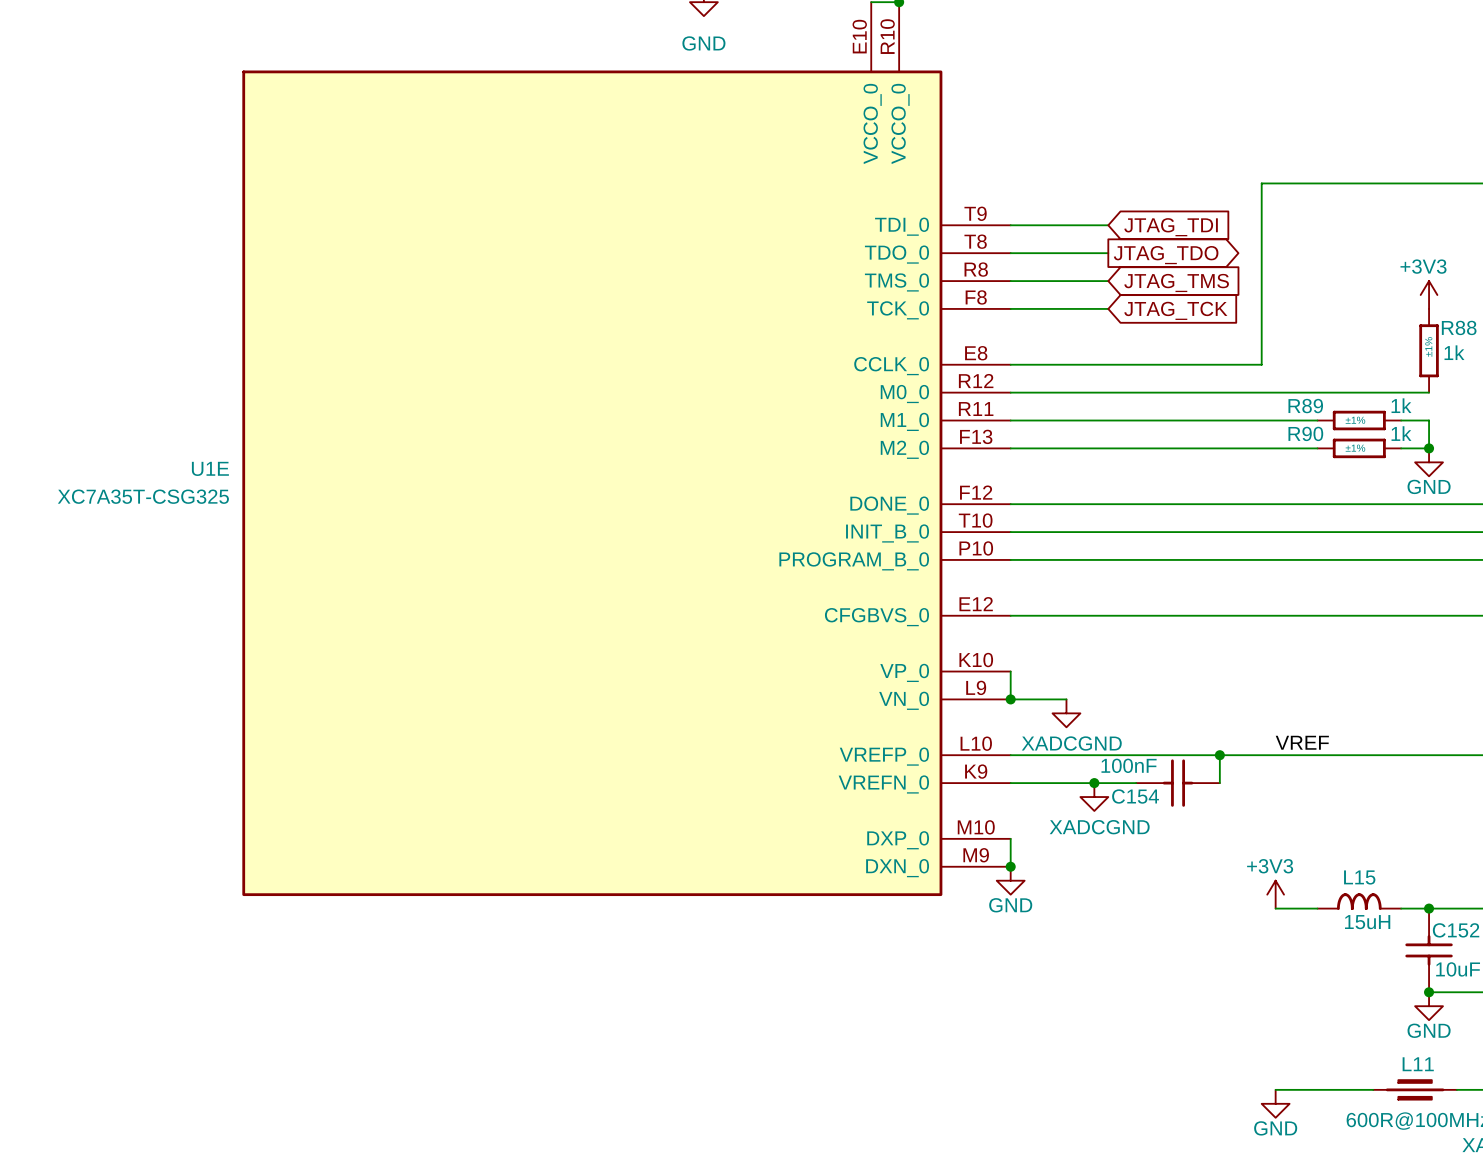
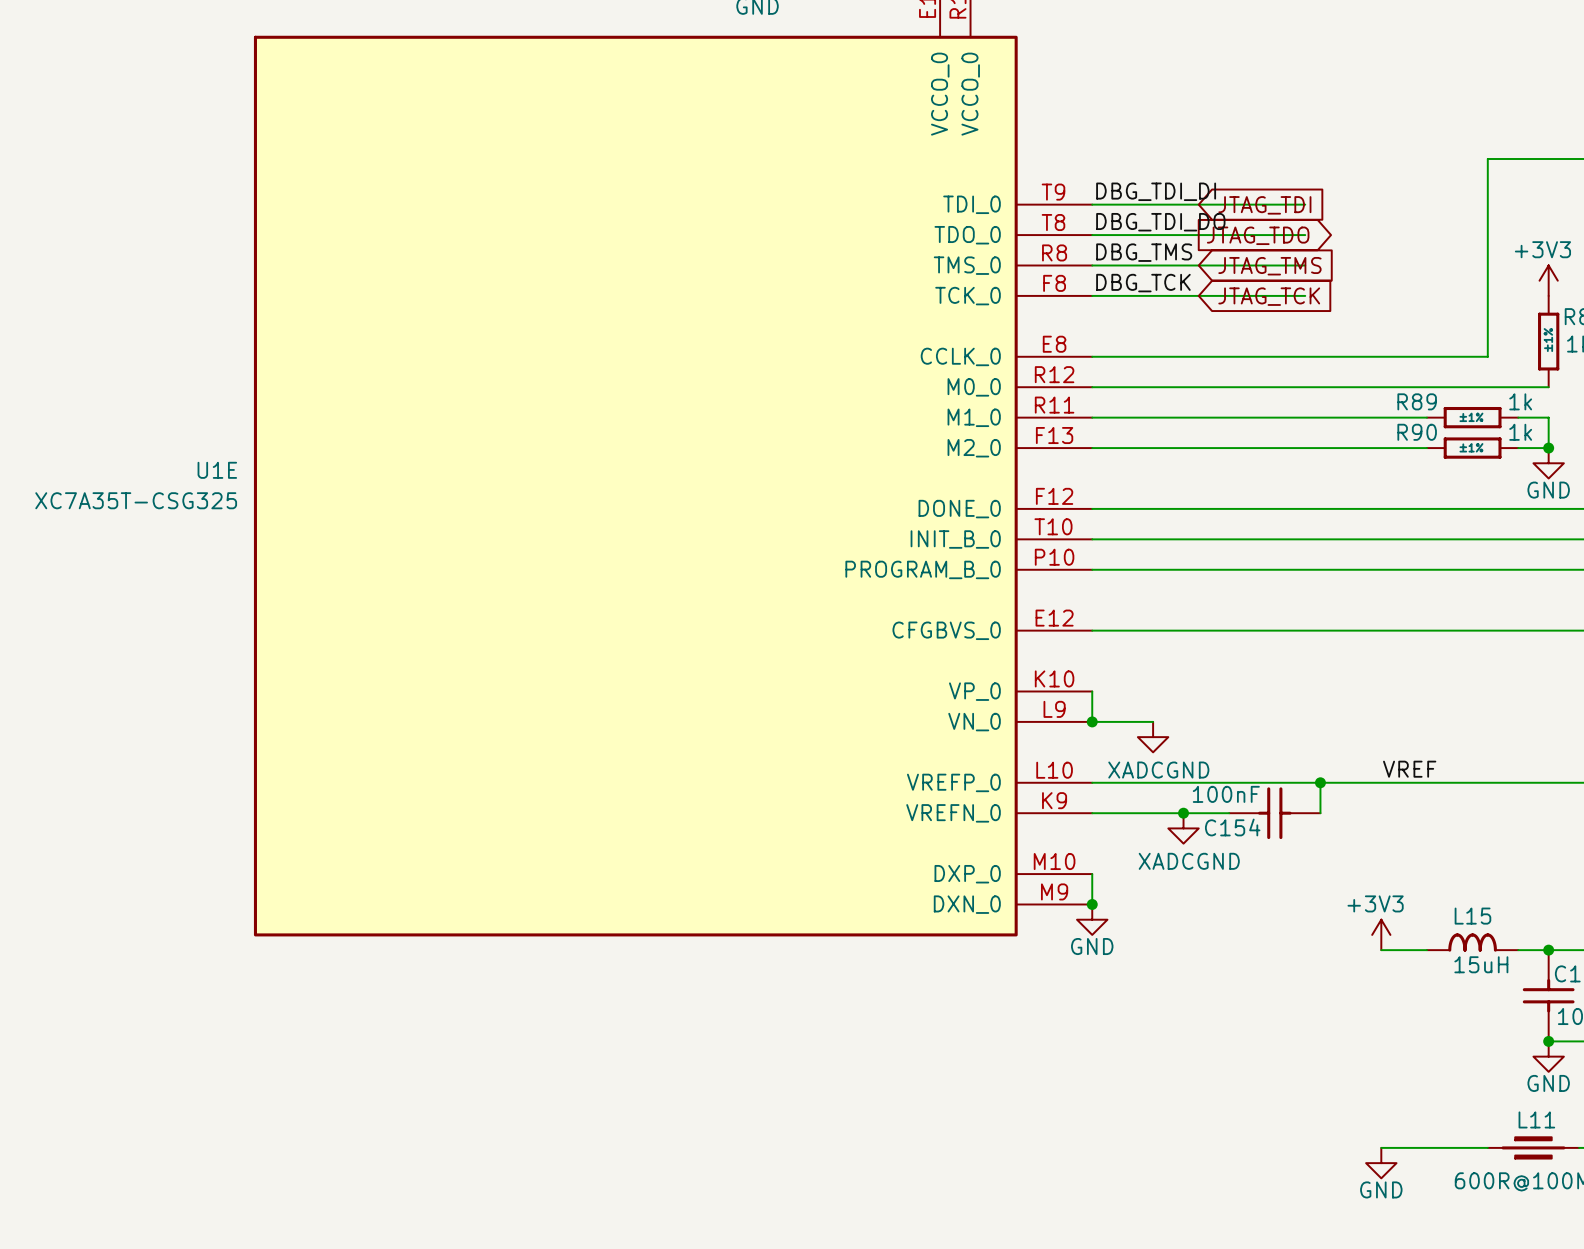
wire: (1373, 183) (1261, 183) (1261, 364) -> (1487, 158) (1487, 356) (1366, 356)
label: none -> DBG_TDI_DI (1156, 191)
wire: none -> (1198, 204) (1305, 204)
label: none -> DBG_TDI_DO (1160, 222)
wire: none -> (1198, 235) (1305, 235)
label: none -> DBG_TMS (1144, 252)
wire: none -> (1198, 265) (1305, 265)
label: none -> DBG_TCK (1143, 283)
wire: none -> (1198, 295) (1305, 295)

